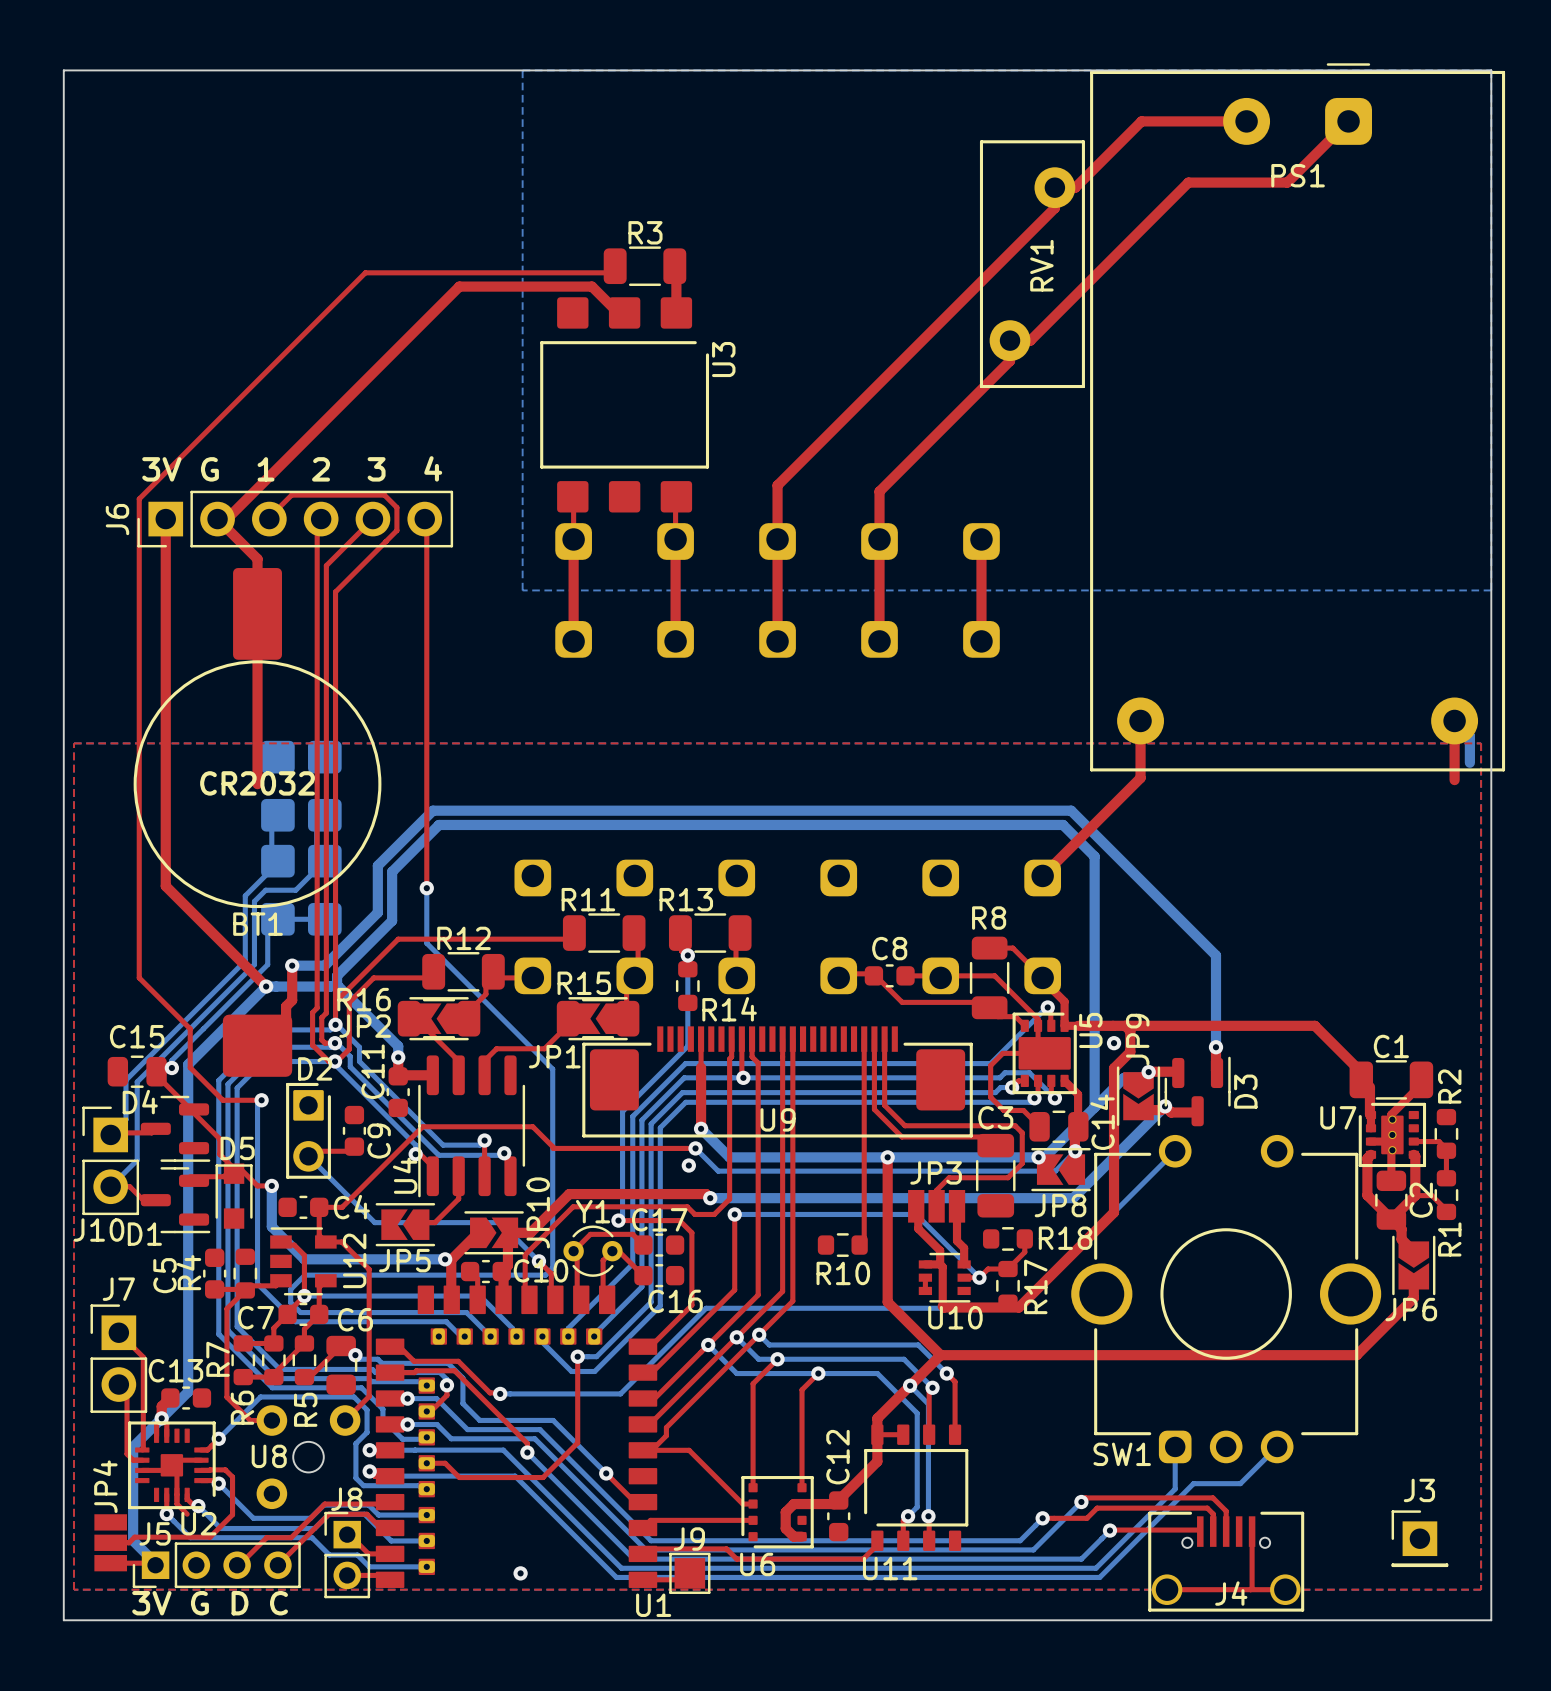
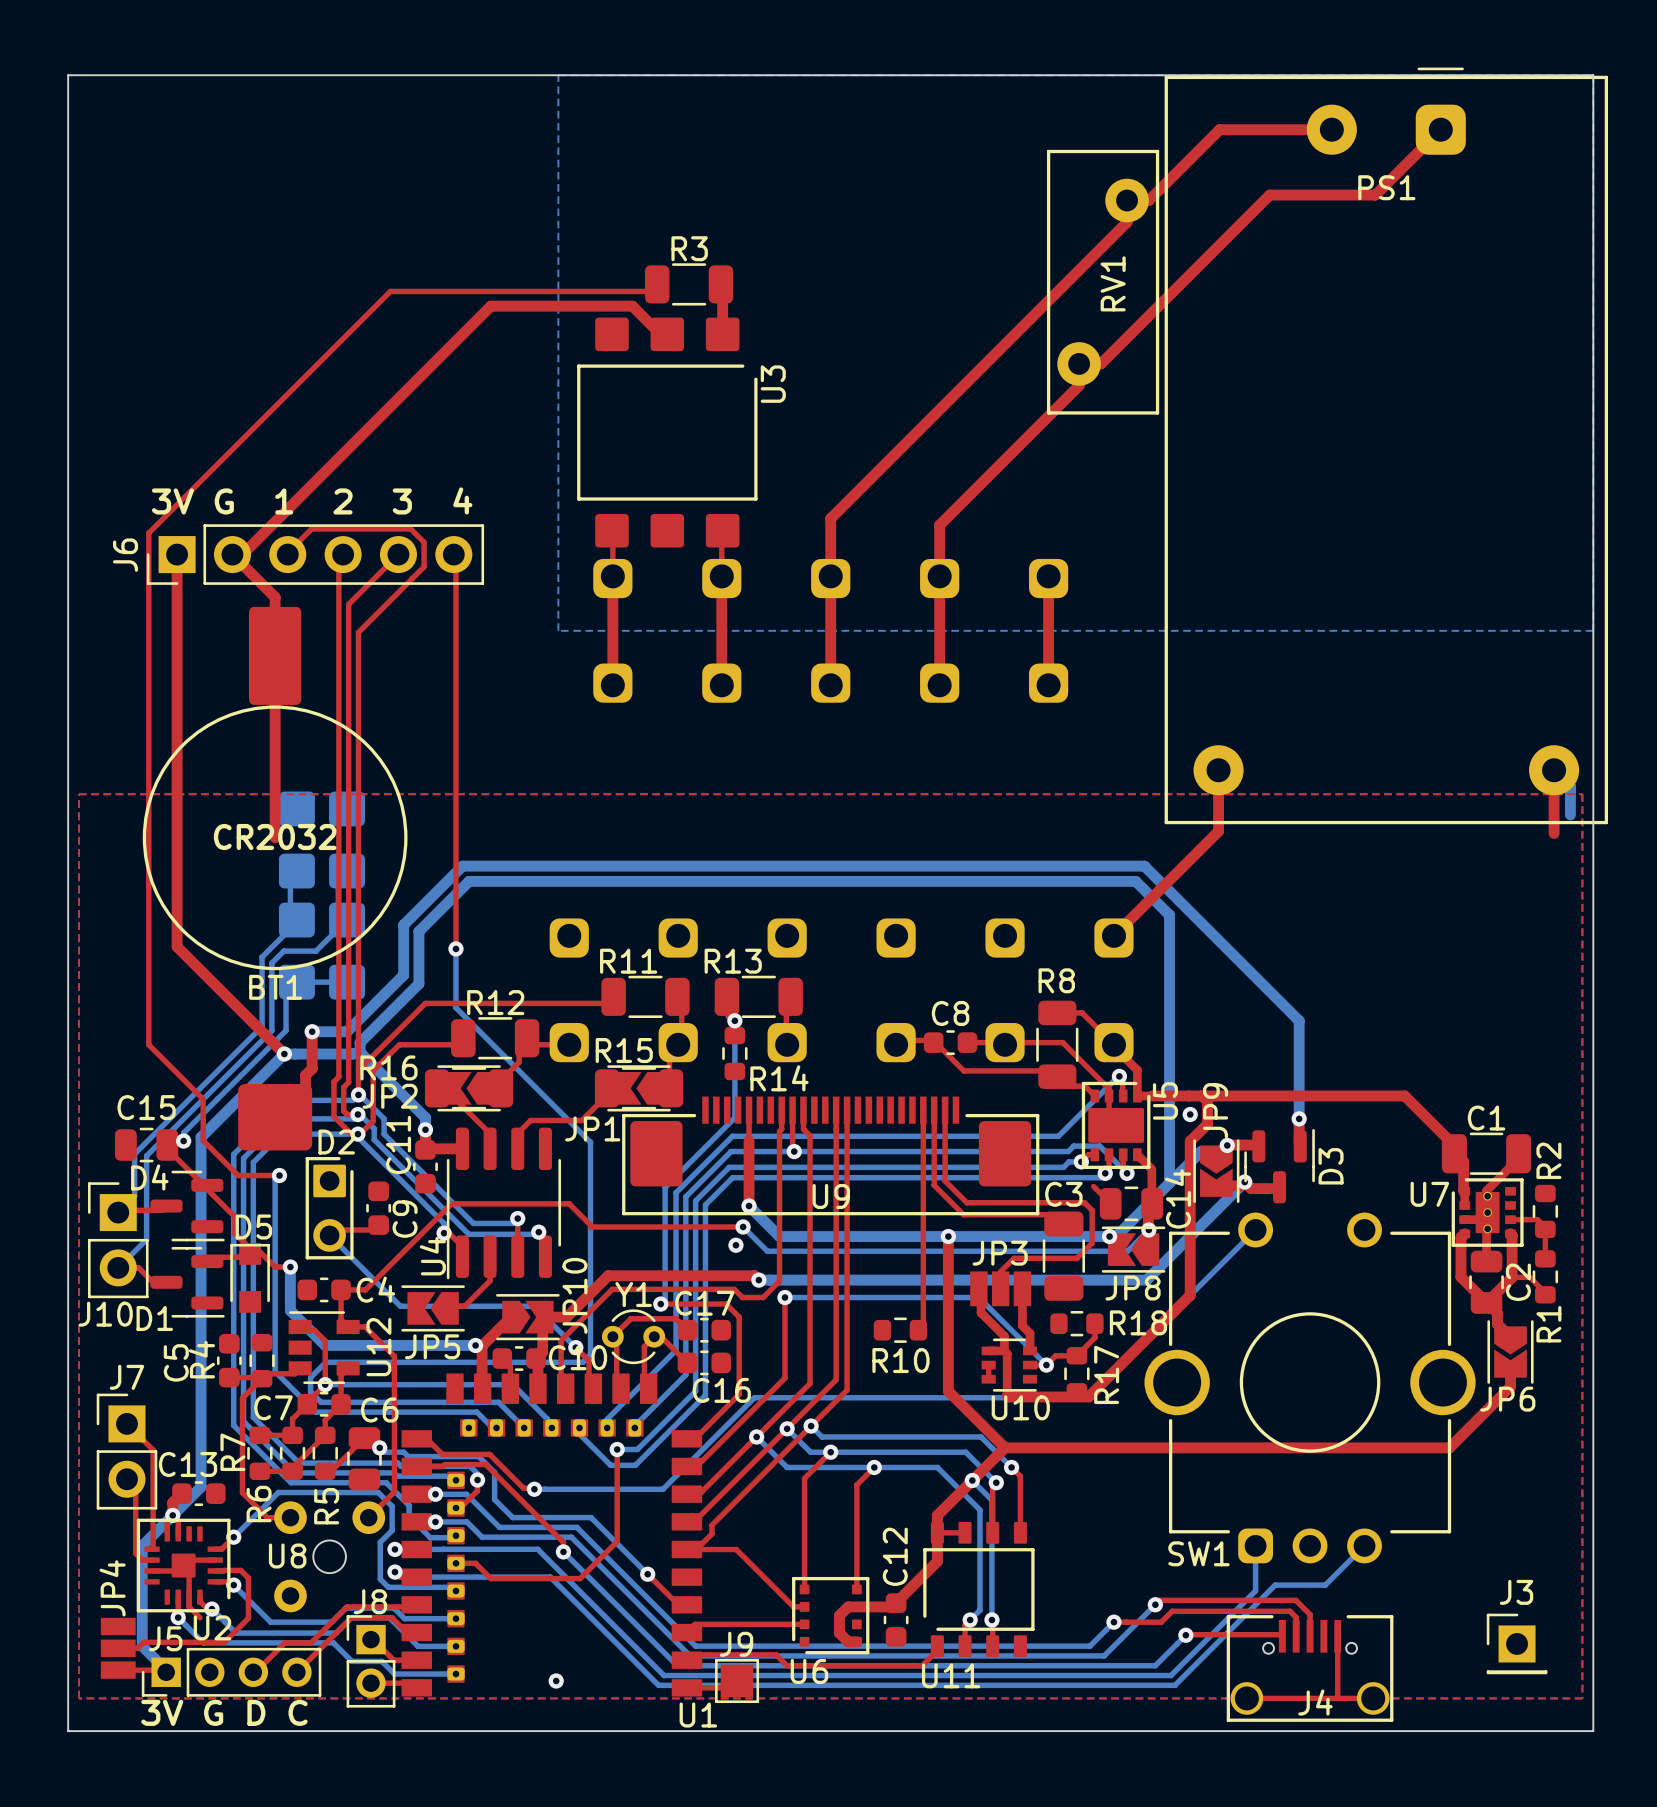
top track: (1044, 1053) (1002, 1053) (990, 1065) (990, 1097) (1003, 1110) (1023, 1110) -> none

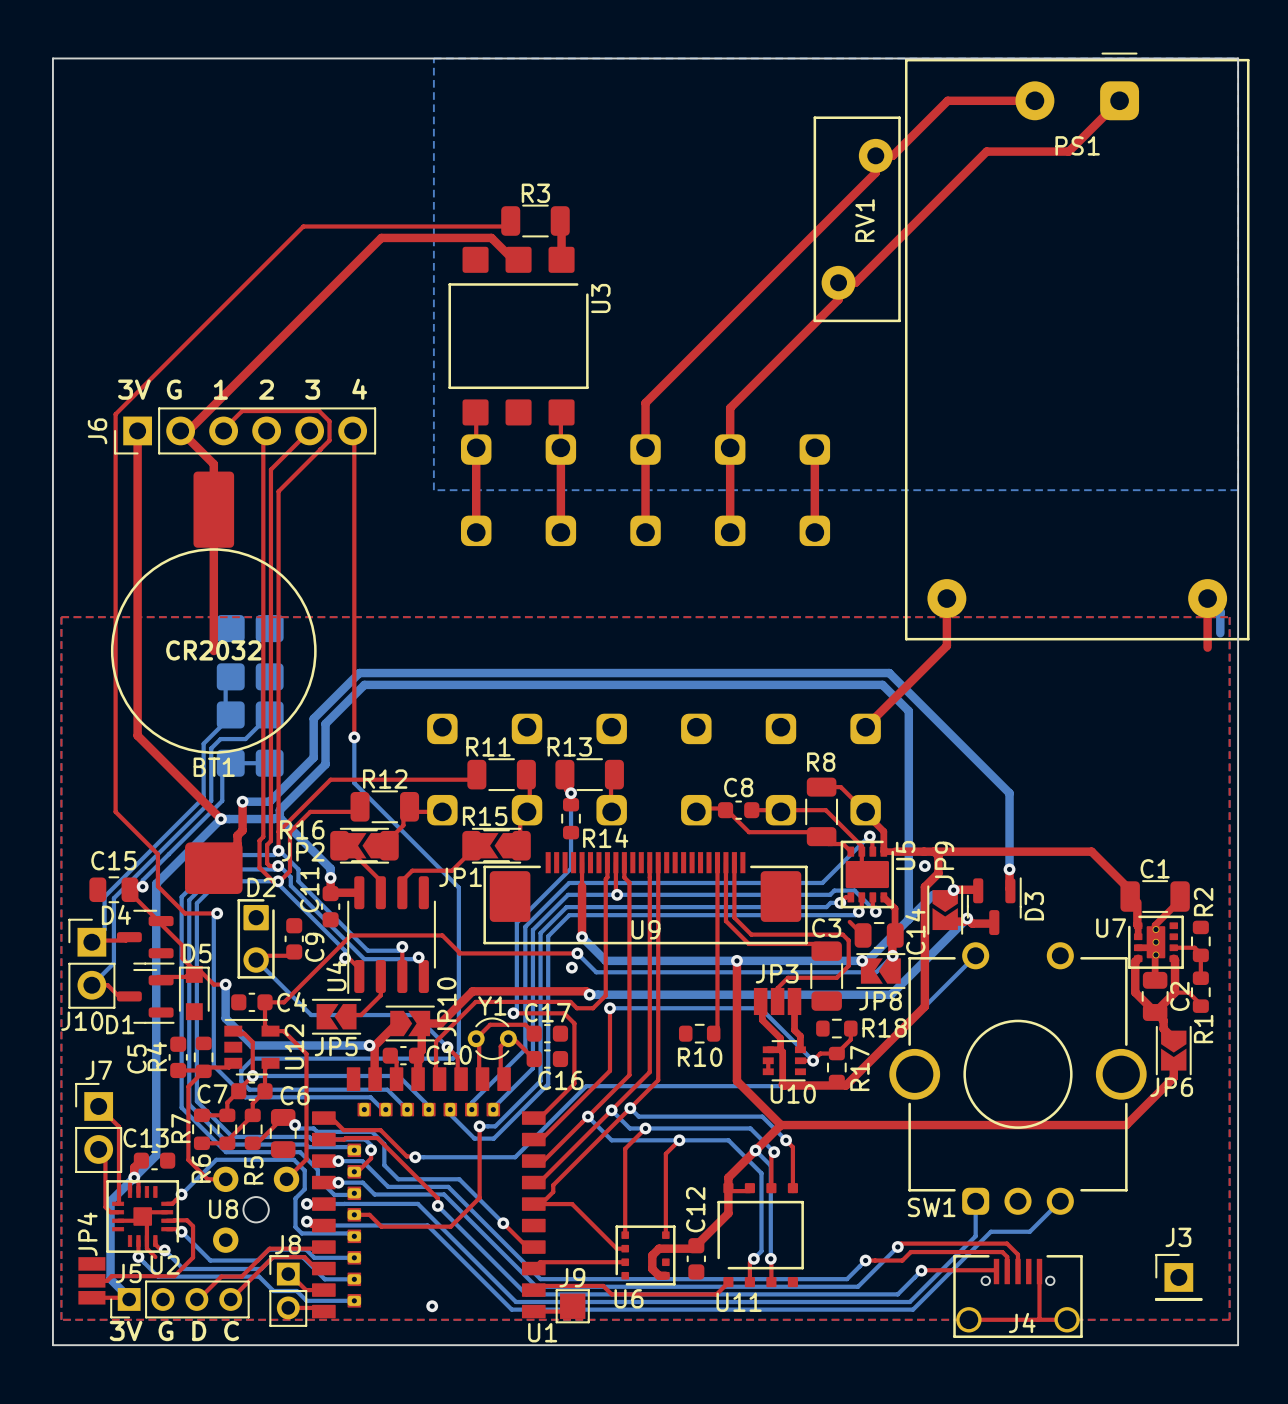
U11 footprint: [921, 1521, 1035, 1658] -> [716, 1183, 804, 1288]

